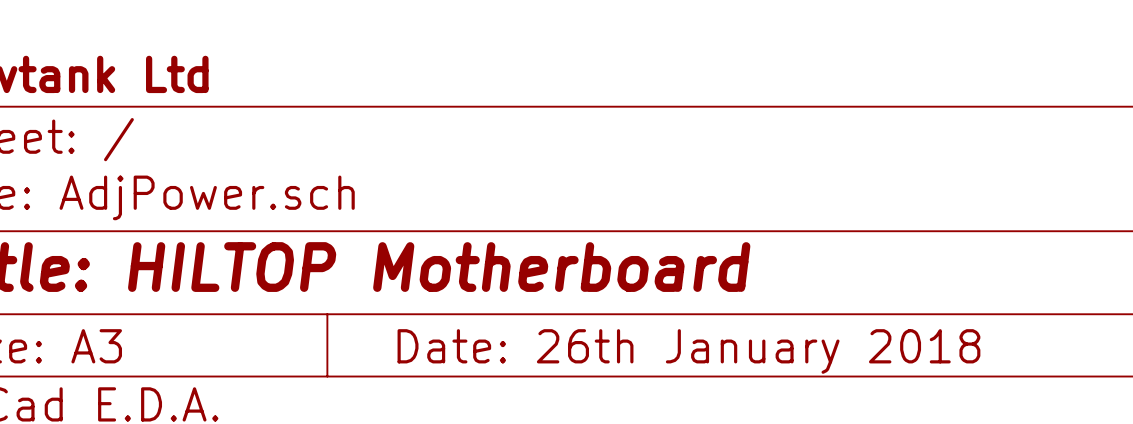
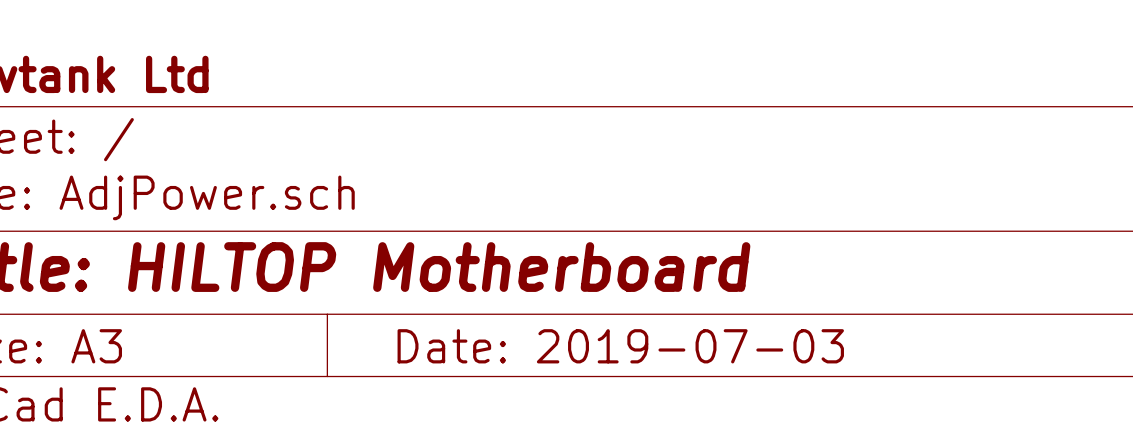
title block: Date: 26th January 2018 (688, 351) -> Date: 2019-07-03 (620, 346)

